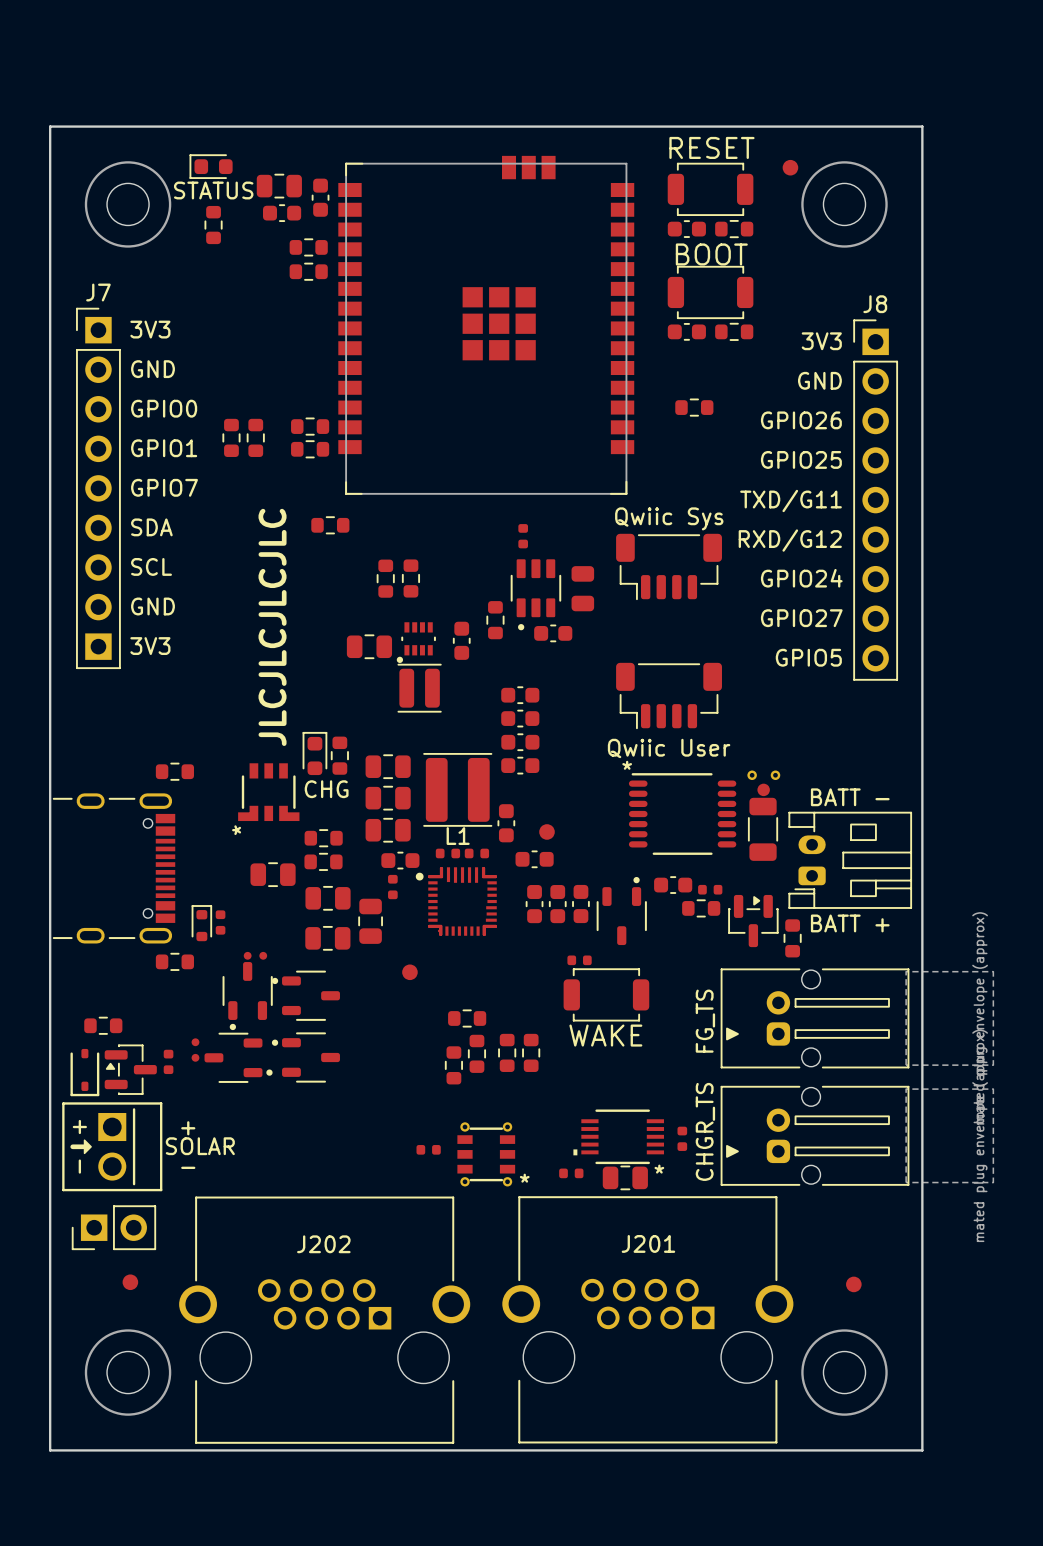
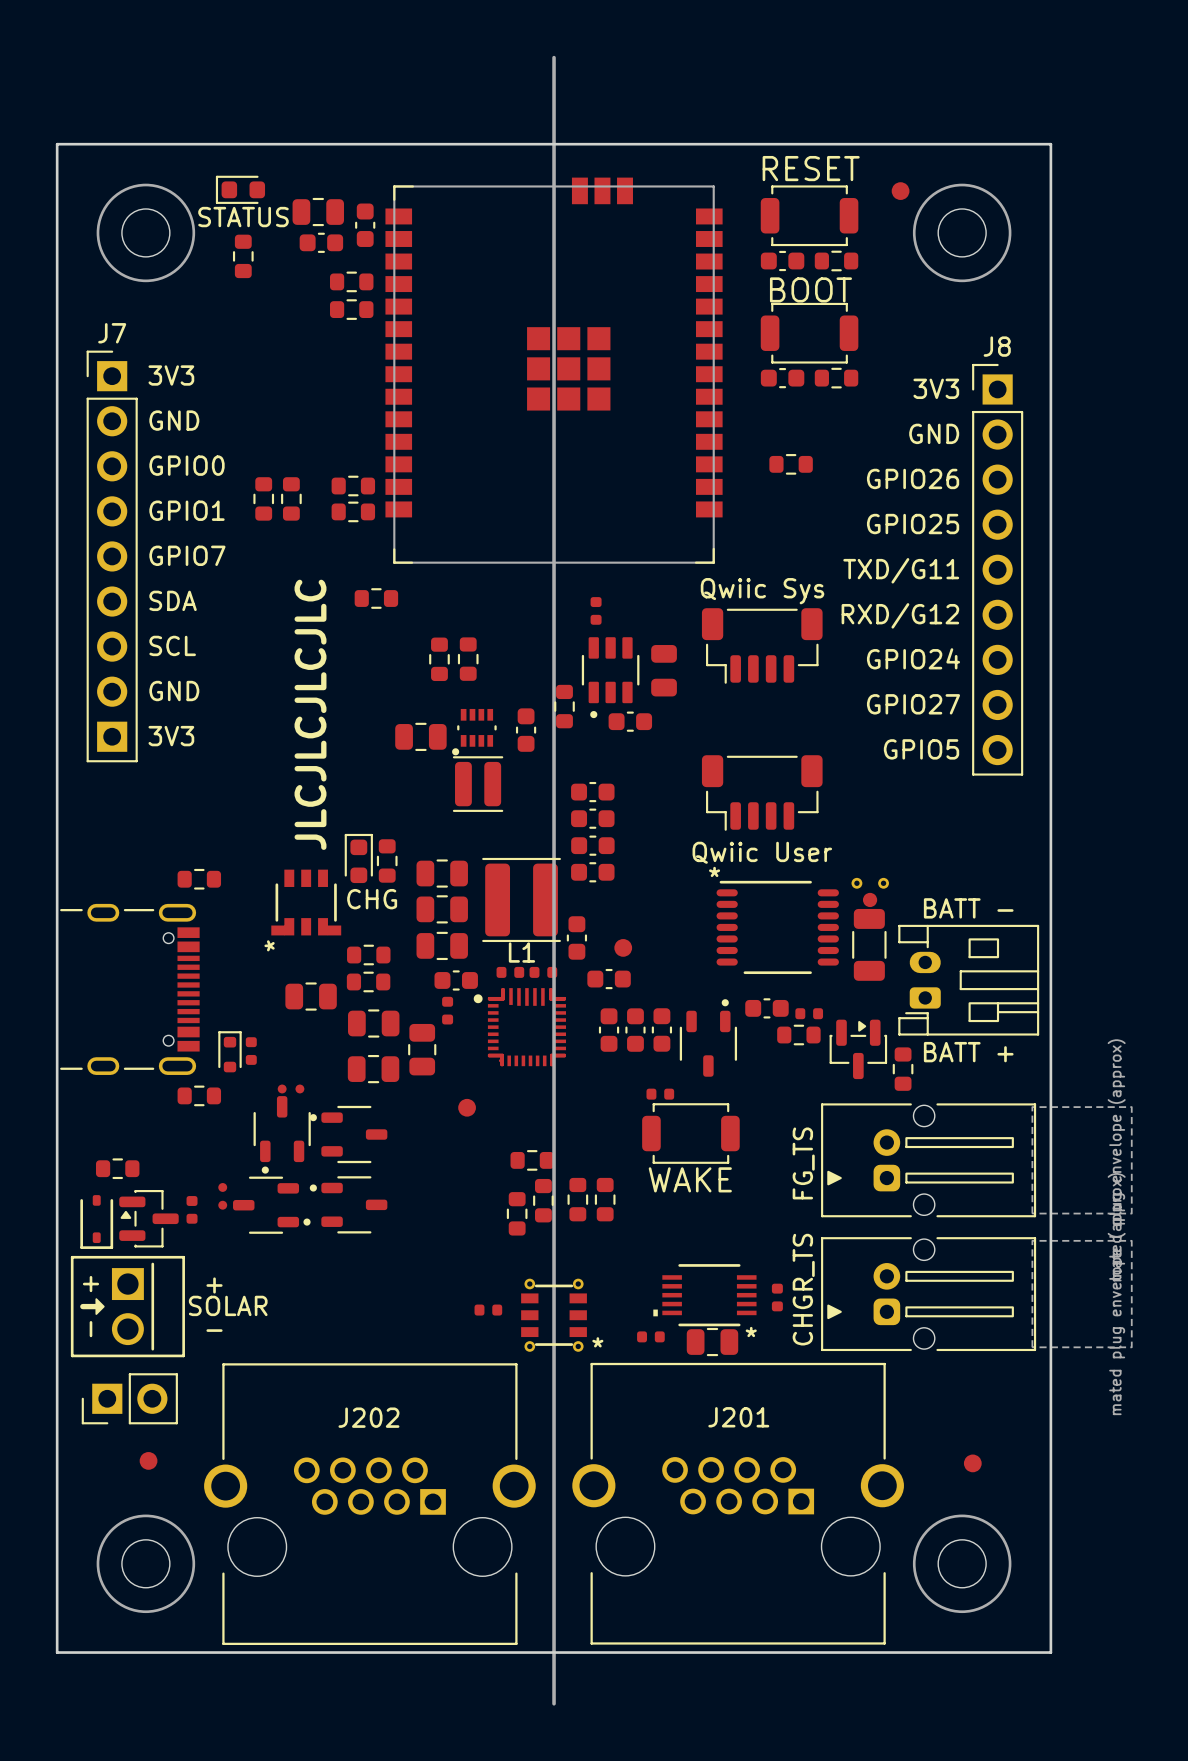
line: none -> (554, 57) (554, 1703)

